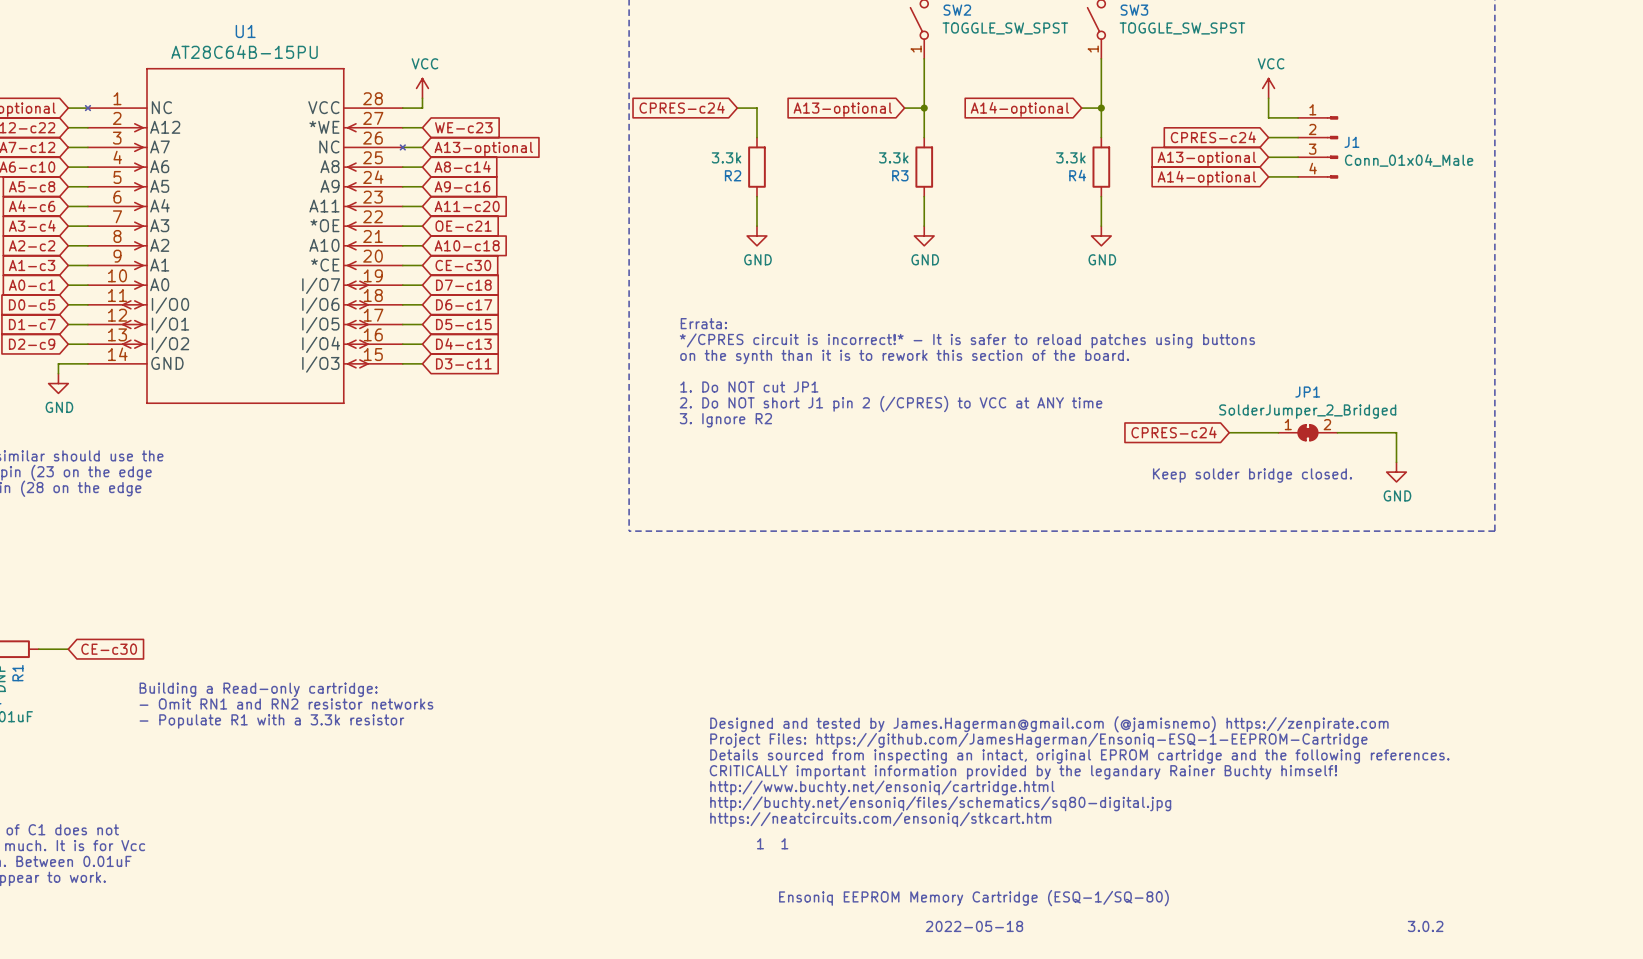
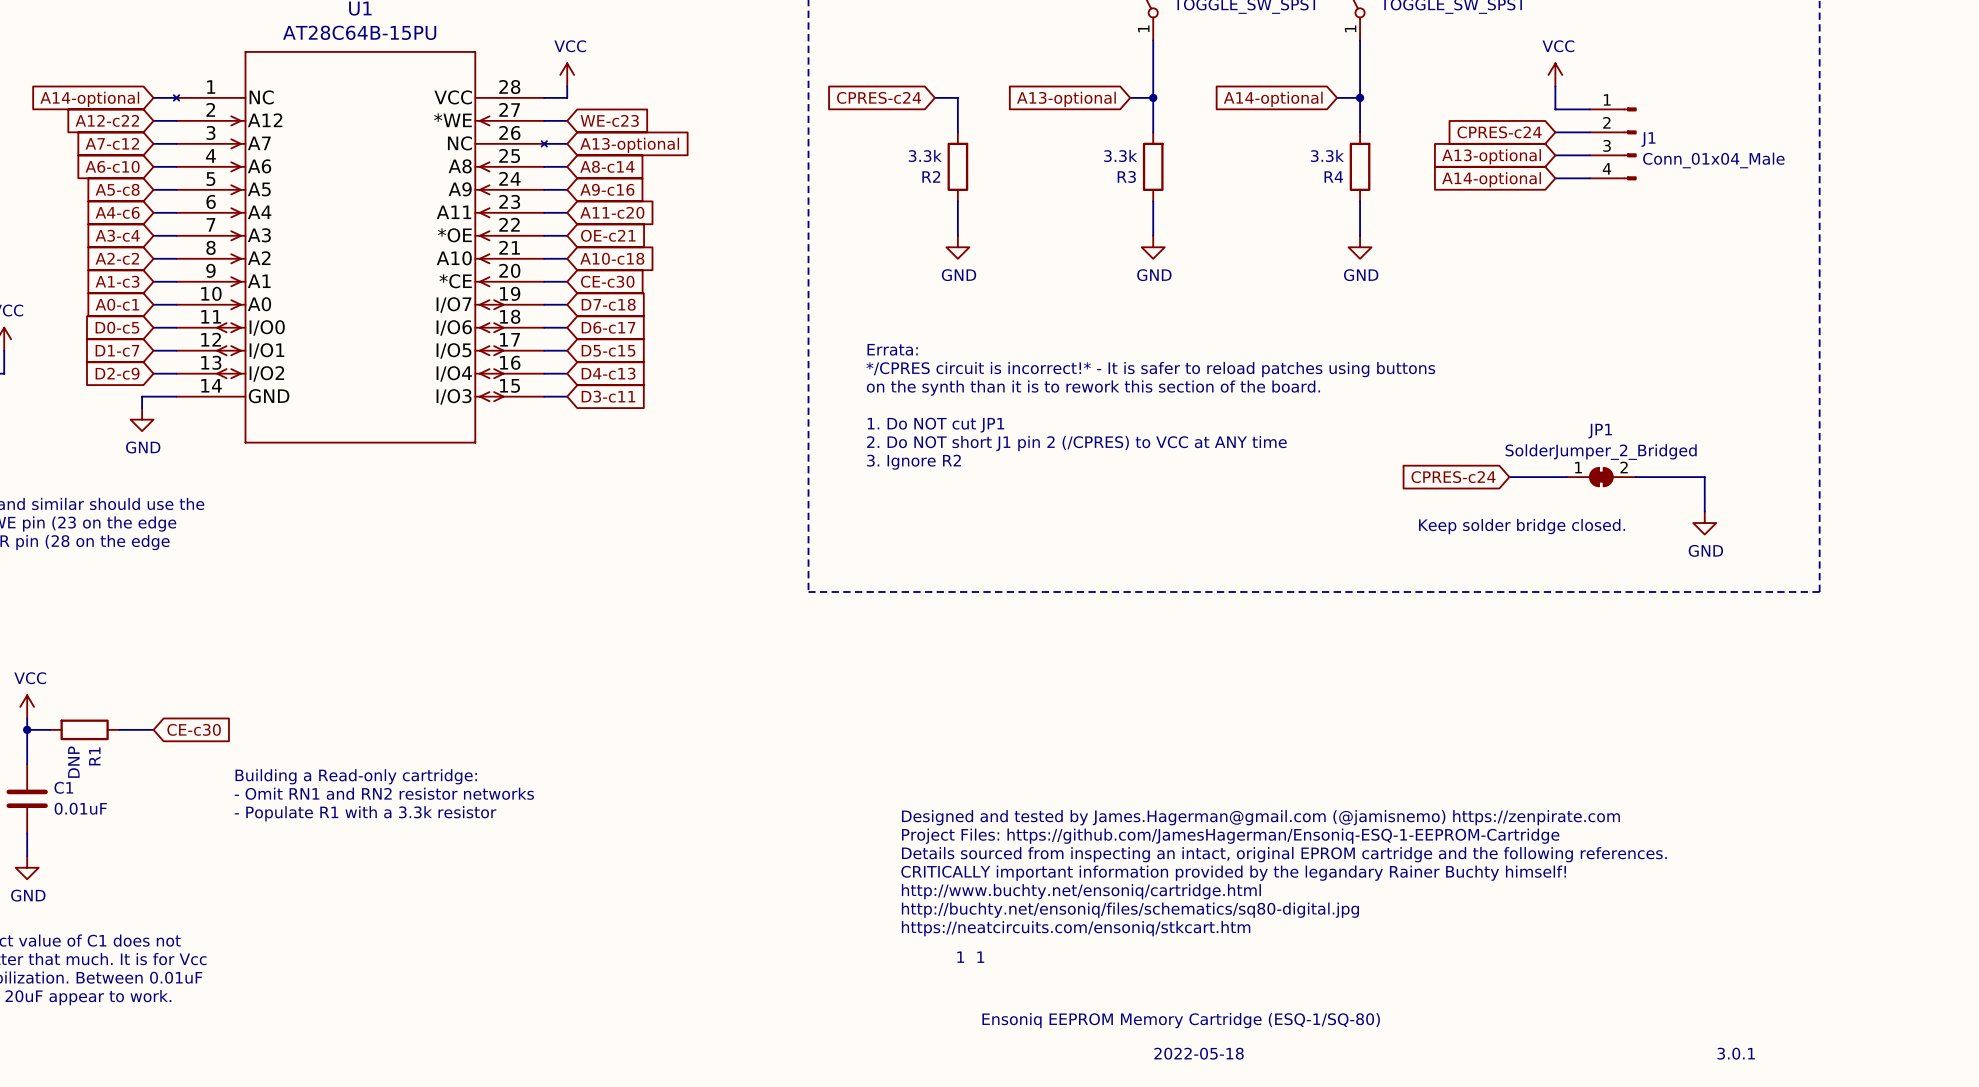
text: 3.0.2 (1425, 926) -> 3.0.1 (1736, 1053)

